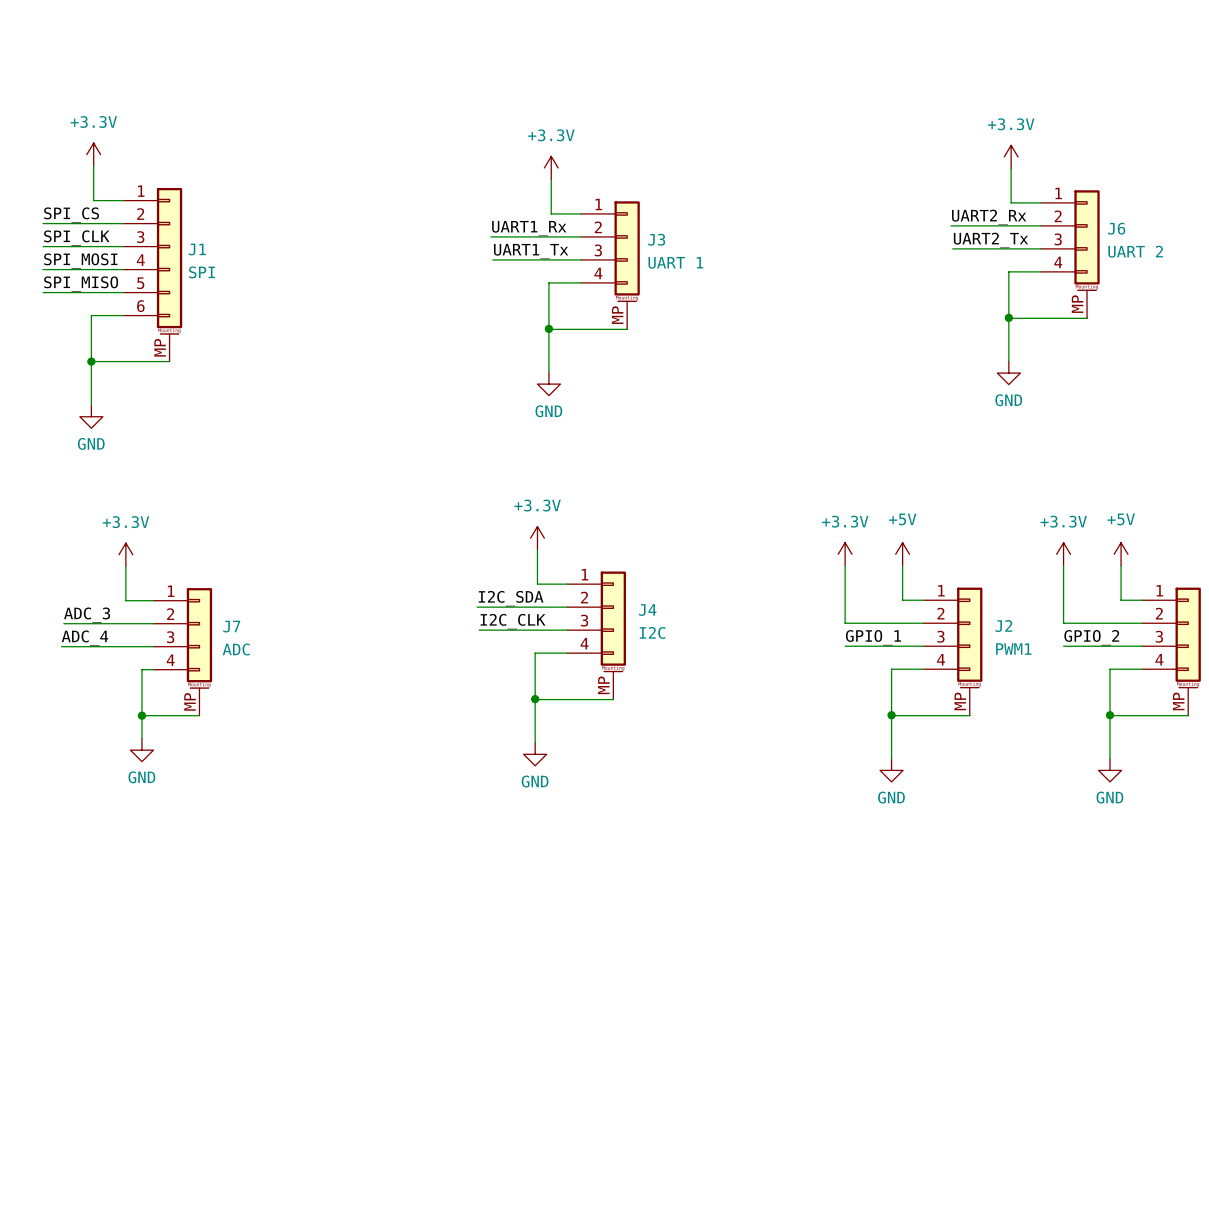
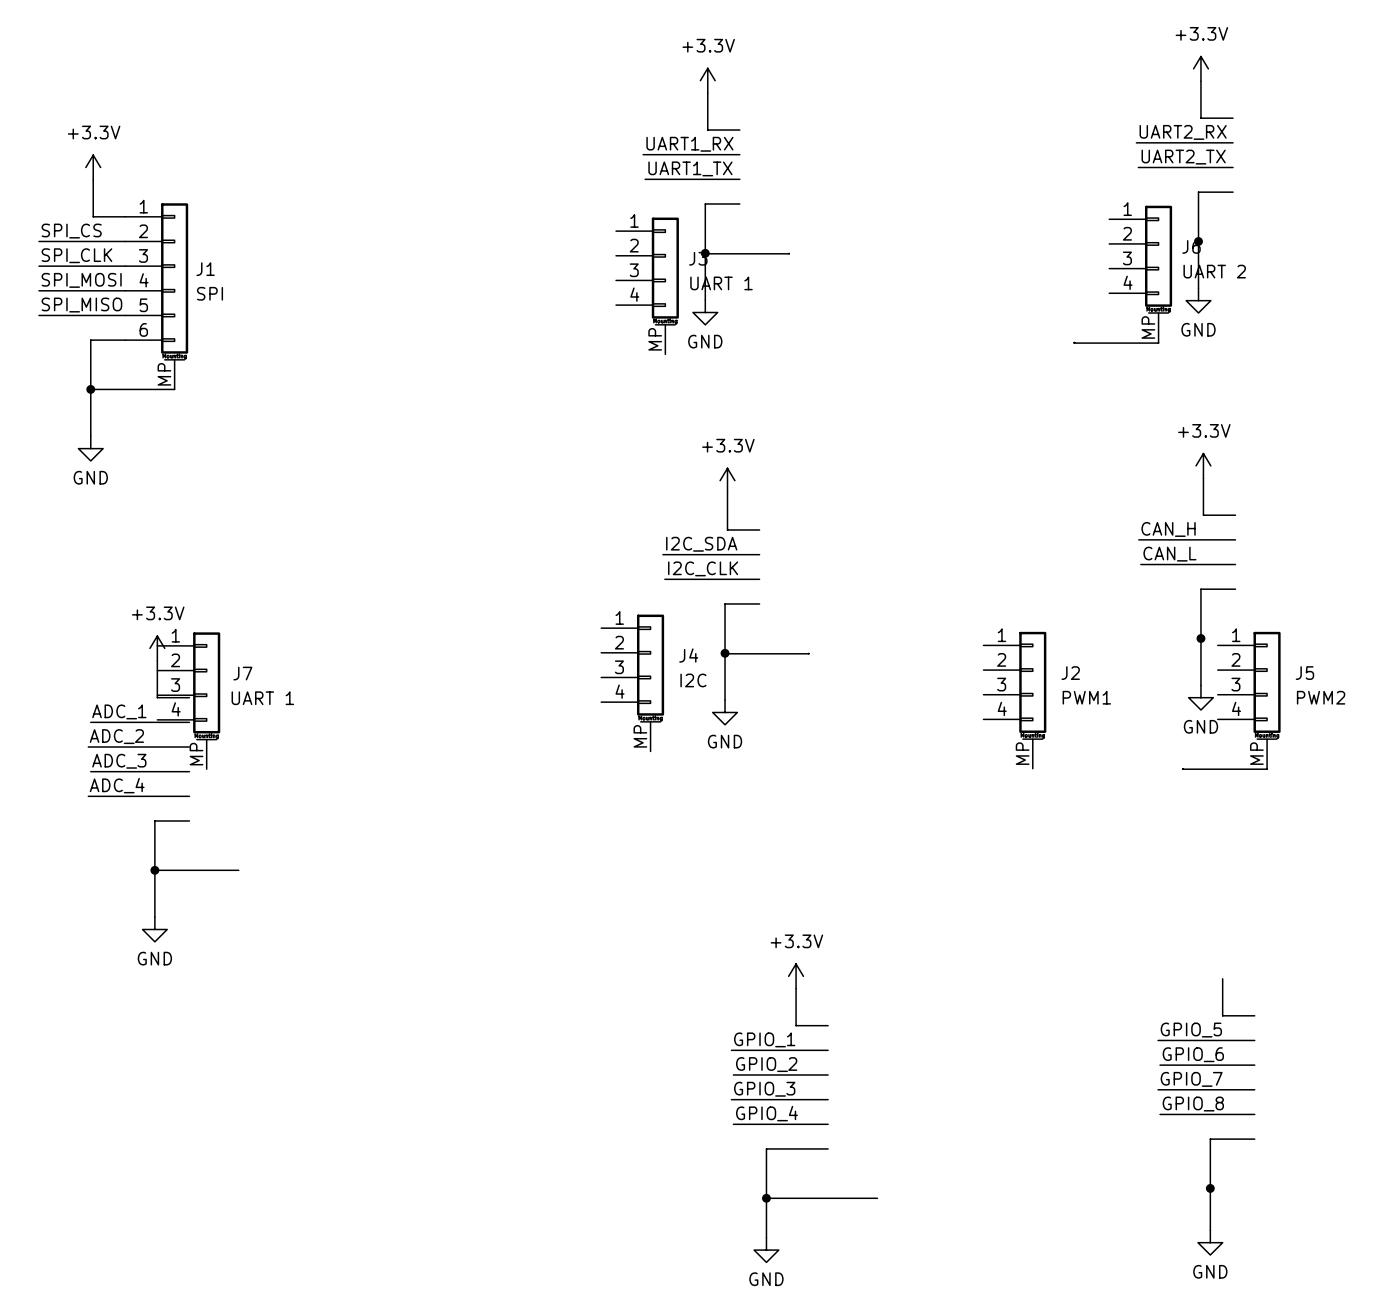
label: none -> UART2_RX (1183, 132)
label: none -> UART1_RX (689, 144)
label: none -> UART2_TX (1183, 157)
power symbol position: +3.3V (1011, 156) -> +3.3V (1200, 68)
label: none -> UART1_TX (690, 168)
power symbol position: +3.3V (551, 167) -> +3.3V (707, 80)
wire: (1011, 168) (1011, 202) (1041, 202) -> (1200, 81) (1200, 118) (1233, 118)
wire: (551, 179) (551, 213) (581, 213) -> (707, 93) (707, 130) (739, 130)
label: UART2_Rx (989, 217) -> none
junction: none -> (1198, 241)
wire: (950, 225) (1041, 225) -> (1136, 142) (1233, 142)
label: UART1_Rx (529, 228) -> none
junction: none -> (705, 253)
wire: (491, 236) (581, 236) -> (643, 154) (739, 154)
label: UART2_Tx (990, 240) -> none
wire: (952, 248) (1041, 248) -> (1138, 167) (1233, 167)
label: UART1_Tx (531, 251) -> none
wire: (492, 259) (581, 259) -> (645, 179) (739, 179)
wire: (1041, 271) (1008, 271) (1008, 361) -> (1233, 192) (1198, 192) (1198, 288)
wire: (581, 282) (548, 282) (548, 372) -> (739, 203) (705, 203) (705, 300)
junction: (1008, 317) -> none
wire: (548, 328) (627, 328) -> (705, 253) (789, 253)
junction: (548, 328) -> none
power symbol position: GND (1008, 373) -> GND (1198, 300)
power symbol position: GND (548, 384) -> GND (705, 312)
wire: none -> (1203, 478) (1203, 515) (1235, 515)
power symbol: none -> +3.3V (727, 480)
label: none -> CAN_H (1168, 529)
wire: none -> (1138, 539) (1235, 539)
label: none -> CAN_L (1169, 554)
wire: none -> (1140, 564) (1235, 564)
power symbol: +3.3V (537, 538) -> none
wire: (537, 549) (537, 584) (567, 584) -> (727, 493) (727, 530) (759, 530)
power symbol position: +3.3V (125, 554) -> +3.3V (157, 648)
power symbol: +3.3V (845, 554) -> none
power symbol: +5V (902, 554) -> none
power symbol position: +3.3V (1063, 554) -> +3.3V (1203, 465)
power symbol: +5V (1121, 554) -> none
wire: (845, 565) (845, 623) (923, 623) -> none
wire: (902, 565) (902, 600) (923, 600) -> none
wire: (1063, 565) (1063, 623) (1142, 623) -> none
wire: (1121, 565) (1121, 600) (1142, 600) -> none
wire: (125, 566) (125, 600) (153, 600) -> none
junction: none -> (1200, 638)
label position: I2C_SDA (511, 598) -> I2C_SDA (701, 544)
wire: (477, 607) (567, 607) -> (662, 554) (759, 554)
junction: none -> (725, 653)
wire: none -> (157, 660) (157, 697) (189, 697)
label position: ADC_3 (87, 615) -> ADC_3 (119, 761)
label position: I2C_CLK (513, 621) -> I2C_CLK (703, 568)
wire: (63, 623) (153, 623) -> none
wire: (479, 630) (567, 630) -> (664, 579) (759, 579)
label: GPIO_1 (873, 637) -> none
label: GPIO_2 (1091, 637) -> none
label position: ADC_4 (84, 638) -> ADC_4 (117, 785)
wire: (61, 646) (153, 646) -> (90, 722) (189, 722)
wire: (845, 646) (923, 646) -> none
wire: (1063, 646) (1142, 646) -> none
J7 value: ADC (236, 649) -> UART 1 (262, 698)
wire: (567, 653) (535, 653) (535, 742) -> (759, 603) (725, 603) (725, 700)
power symbol: none -> GND (725, 712)
label: none -> ADC_1 (119, 711)
wire: (153, 669) (141, 669) (141, 738) -> none
wire: (923, 669) (891, 669) (891, 758) -> none
wire: (1142, 669) (1110, 669) (1110, 758) -> (1235, 589) (1200, 589) (1200, 685)
label: none -> ADC_2 (116, 736)
wire: none -> (88, 747) (189, 747)
wire: (535, 699) (613, 699) -> (725, 653) (808, 653)
junction: (535, 699) -> none
wire: (141, 715) (199, 715) -> none
junction: (141, 715) -> none
wire: (891, 715) (969, 715) -> none
junction: (891, 715) -> none
junction: (1110, 715) -> none
wire: none -> (90, 771) (189, 771)
wire: none -> (88, 796) (189, 796)
power symbol position: GND (141, 750) -> GND (154, 929)
power symbol: GND (535, 754) -> none
wire: none -> (189, 820) (154, 820) (154, 917)
power symbol: GND (891, 770) -> none
power symbol position: GND (1110, 770) -> GND (1200, 697)
wire: none -> (154, 870) (238, 870)
junction: none -> (154, 870)
power symbol: none -> +3.3V (796, 976)
wire: none -> (1222, 978) (1222, 1015) (1254, 1015)
wire: none -> (796, 988) (796, 1025) (828, 1025)
label: none -> GPIO_5 (1191, 1030)
wire: none -> (1158, 1040) (1254, 1040)
label: none -> GPIO_1 (764, 1039)
wire: none -> (731, 1050) (828, 1050)
label: none -> GPIO_6 (1193, 1054)
wire: none -> (1160, 1065) (1254, 1065)
label: none -> GPIO_2 (766, 1064)
wire: none -> (733, 1074) (828, 1074)
label: none -> GPIO_7 (1191, 1079)
wire: none -> (1158, 1089) (1254, 1089)
label: none -> GPIO_3 (764, 1089)
wire: none -> (731, 1099) (828, 1099)
label: none -> GPIO_8 (1193, 1104)
wire: none -> (1160, 1114) (1254, 1114)
label: none -> GPIO_4 (766, 1113)
wire: none -> (733, 1124) (828, 1124)
wire: none -> (1254, 1139) (1210, 1139) (1210, 1230)
wire: none -> (828, 1148) (766, 1148) (766, 1237)
junction: none -> (1210, 1188)
wire: none -> (766, 1198) (877, 1198)
junction: none -> (766, 1198)
power symbol: none -> GND (1210, 1242)
power symbol: none -> GND (766, 1250)

